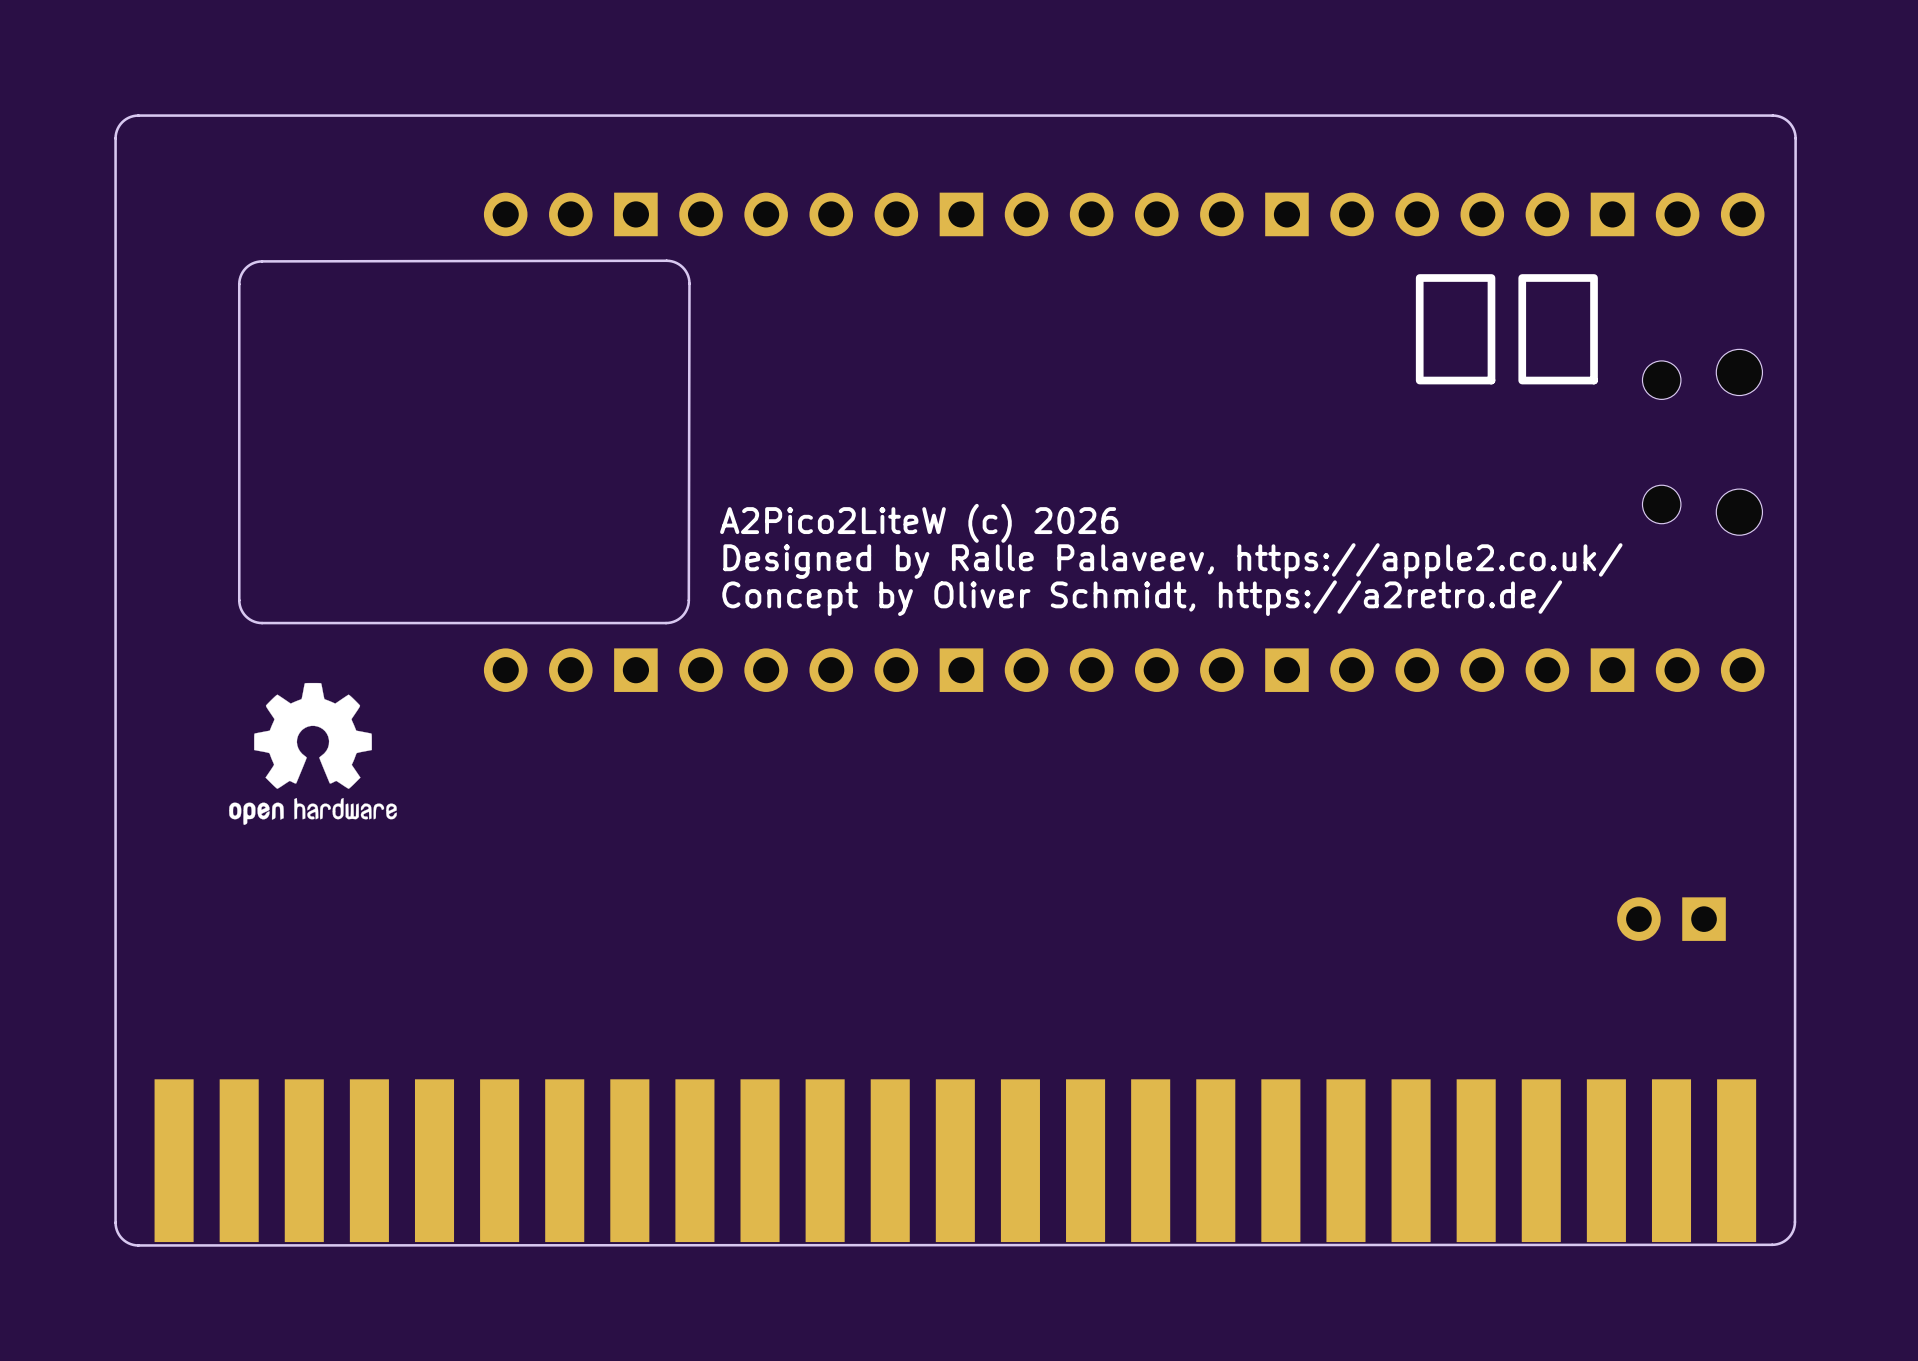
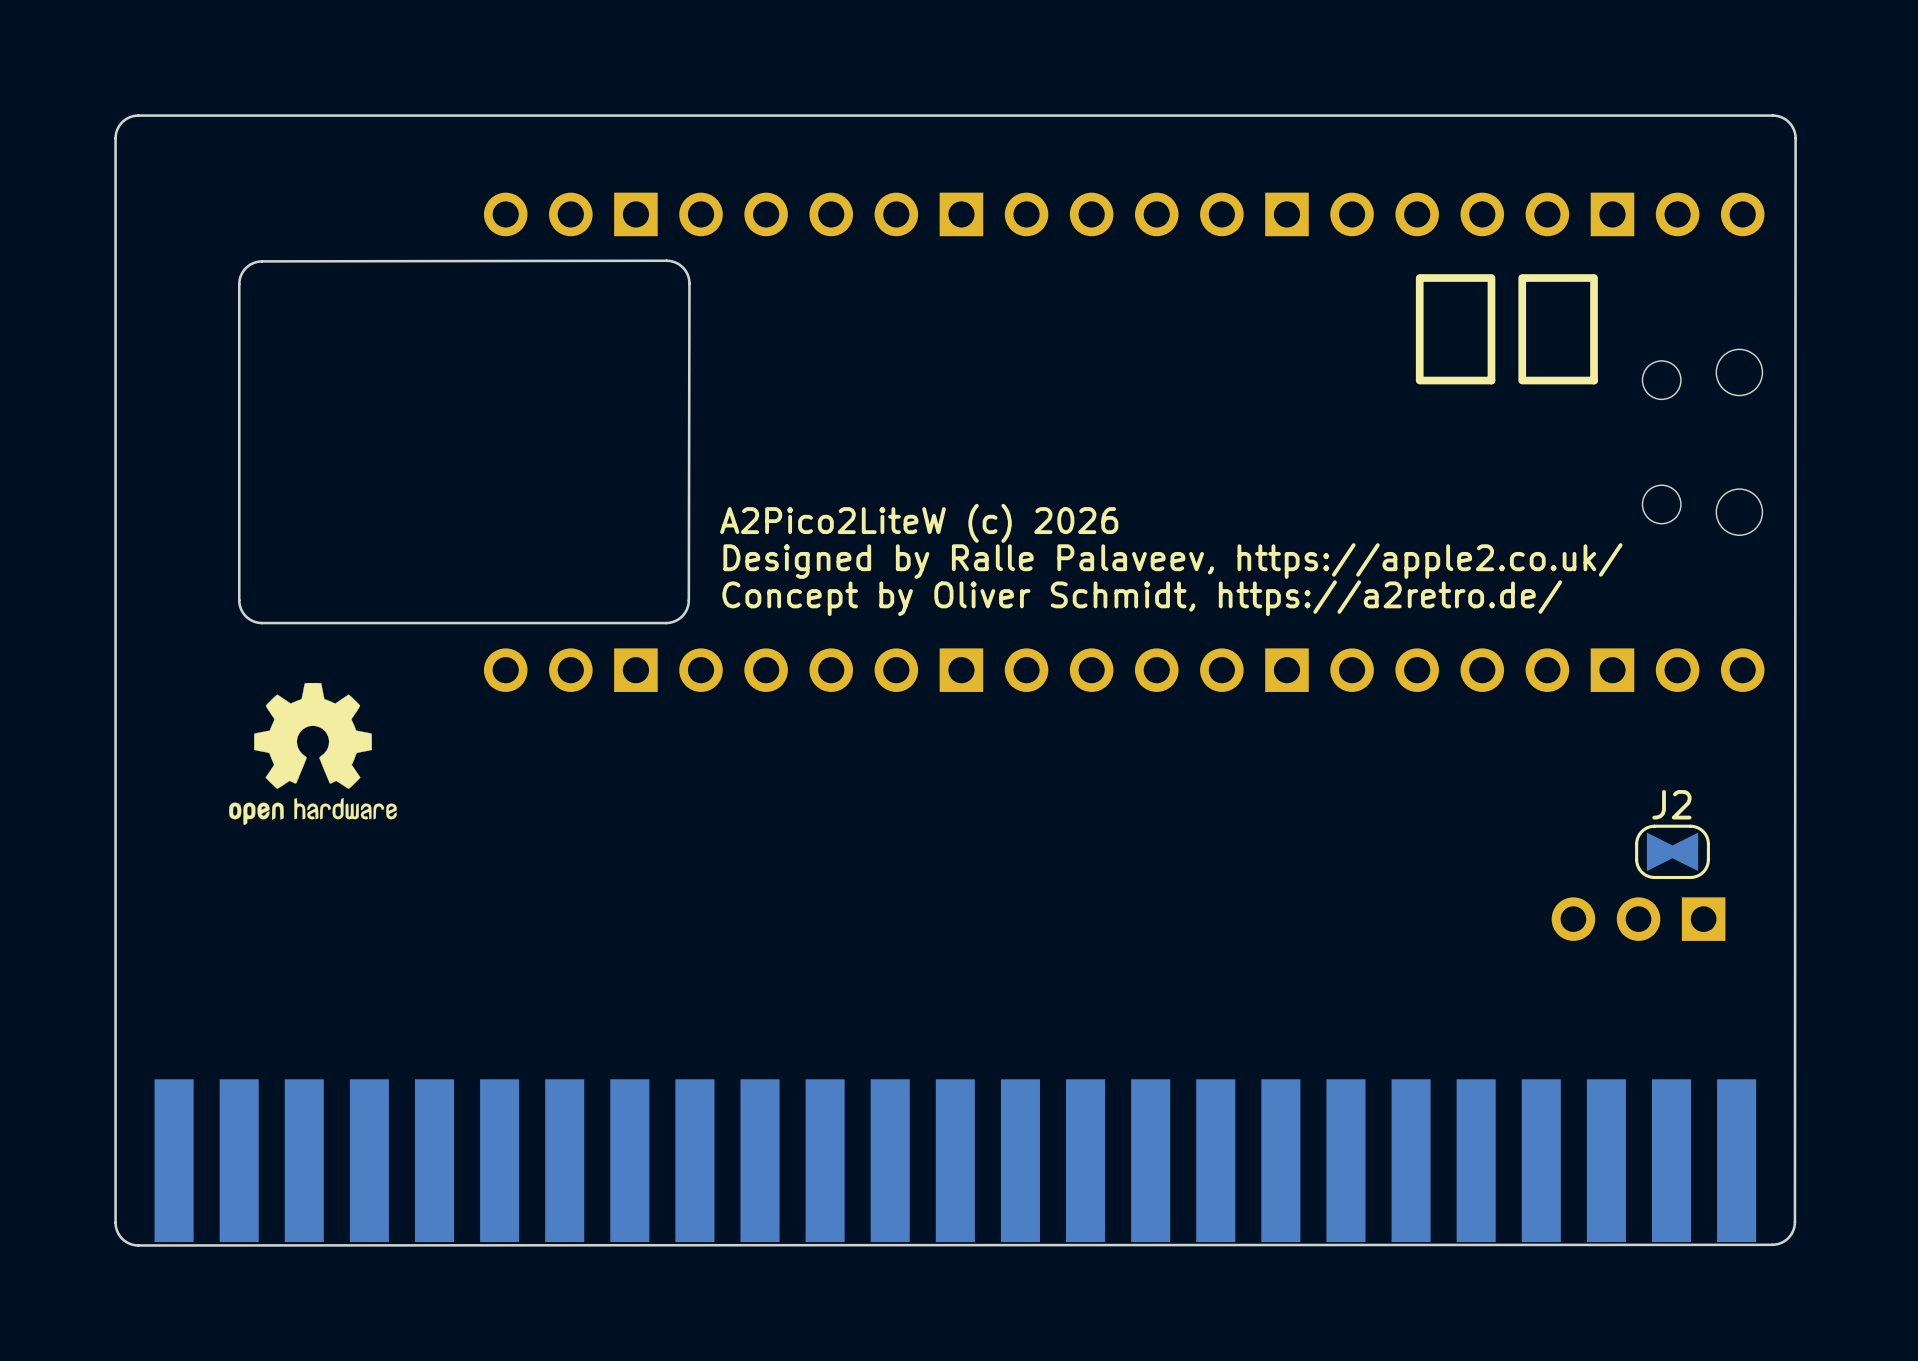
J2: none -> (1672, 851)
part: none -> (1638, 919)
part: (1671, 919) -> none

